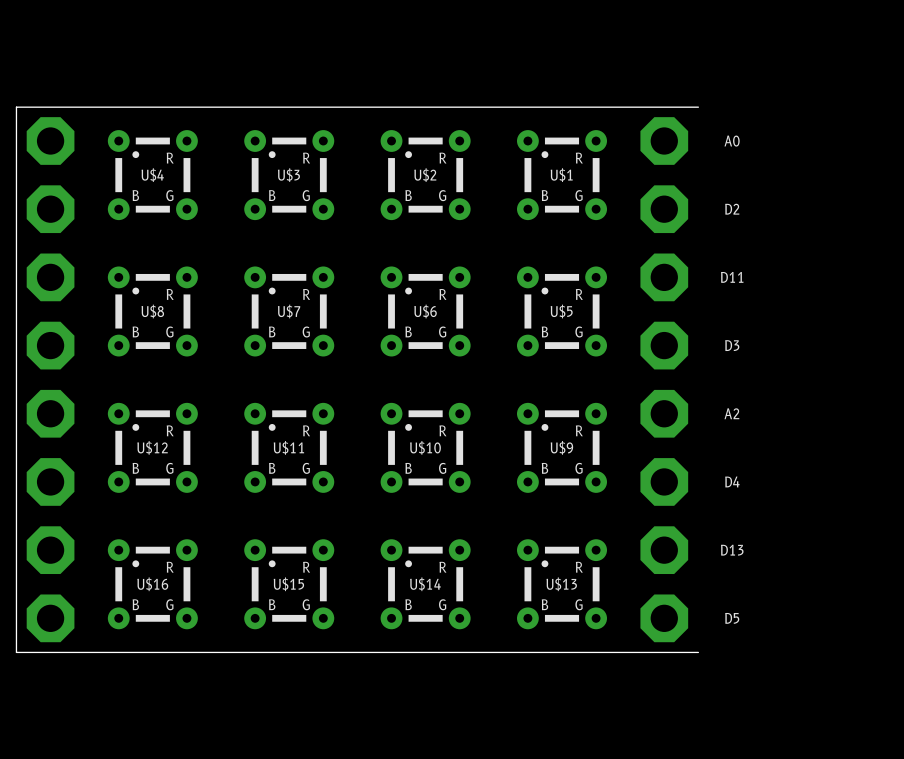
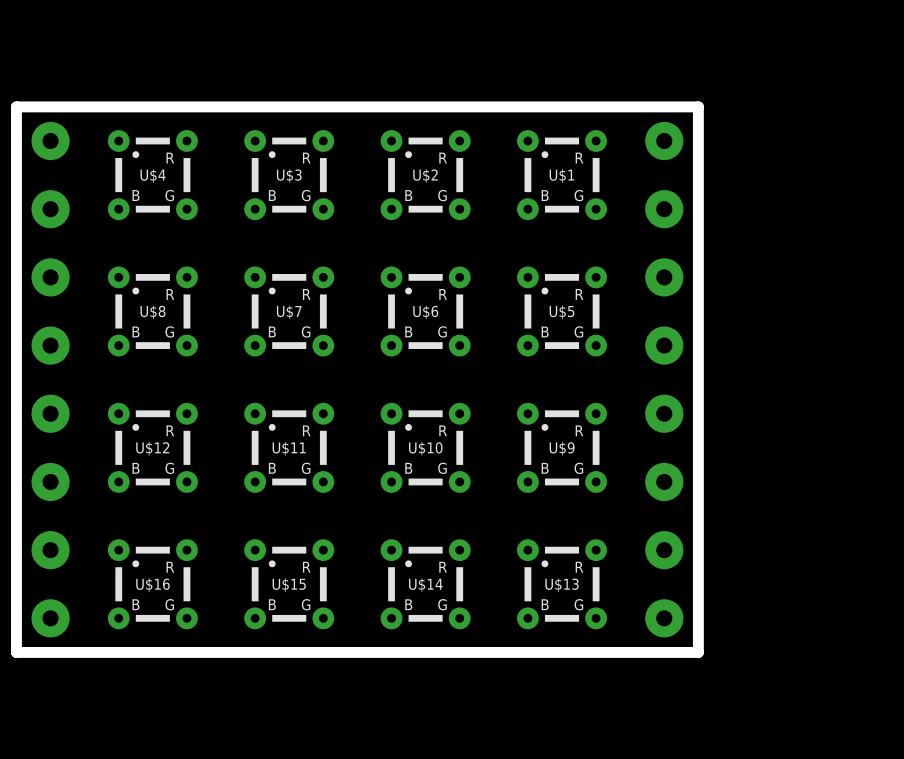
board edge width: thin (16, 107) (16, 652) (698, 652) -> thick (16, 107) (16, 652) (698, 652)
board edge: (698, 107) (16, 107) -> (698, 652) (698, 106) (16, 106)
part footprint: [26, 117, 75, 643] -> [31, 121, 70, 638]
part footprint: [640, 117, 689, 643] -> [645, 121, 684, 638]
text: A0 (732, 141) -> none
text: D2 (732, 209) -> none
text: D11 (732, 277) -> none
text: D3 (732, 345) -> none
text: A2 (731, 413) -> none
text: D4 (732, 481) -> none
text: D13 (732, 550) -> none
text: D5 (732, 618) -> none

